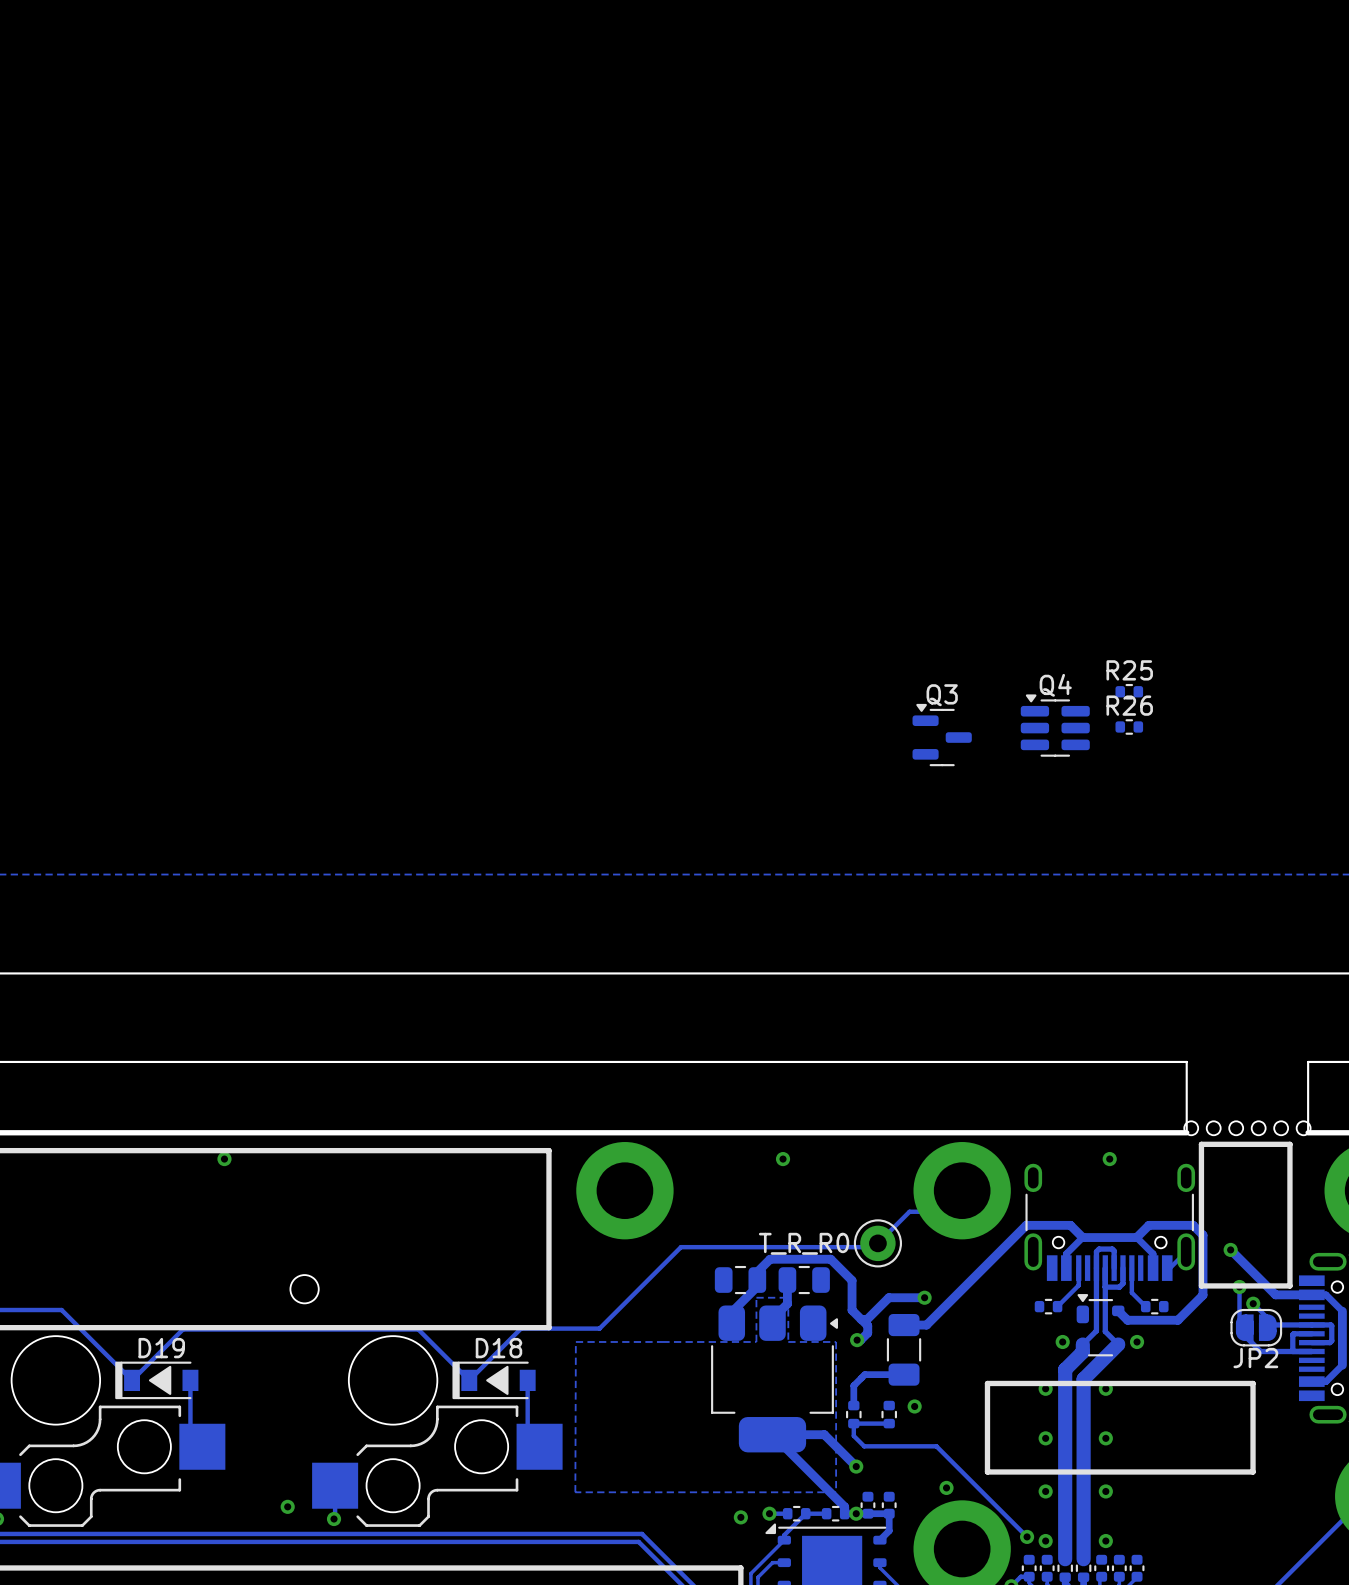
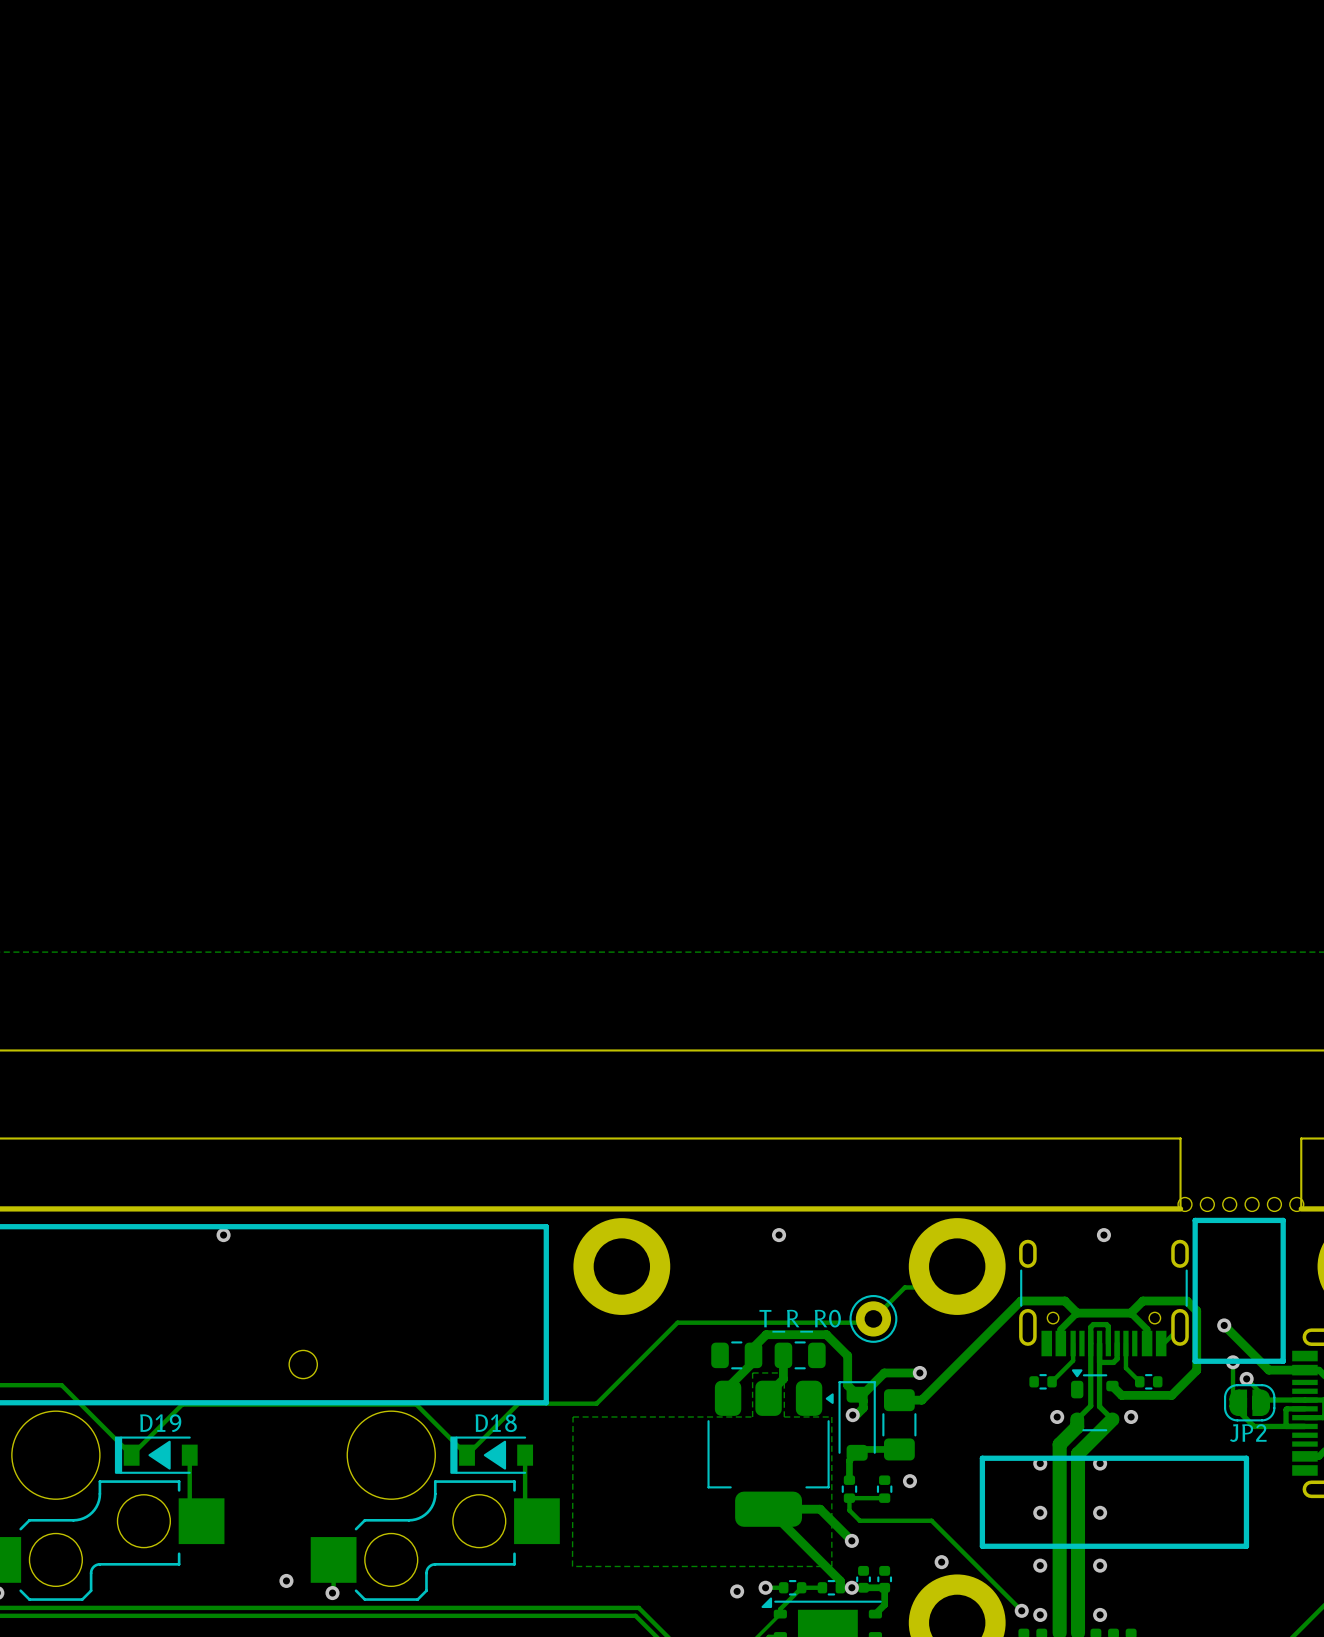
R25: (1129, 691) -> none
Q4: (1055, 725) -> none
R26: (1129, 726) -> none
Q3: (942, 735) -> none
part: none -> (857, 1420)

